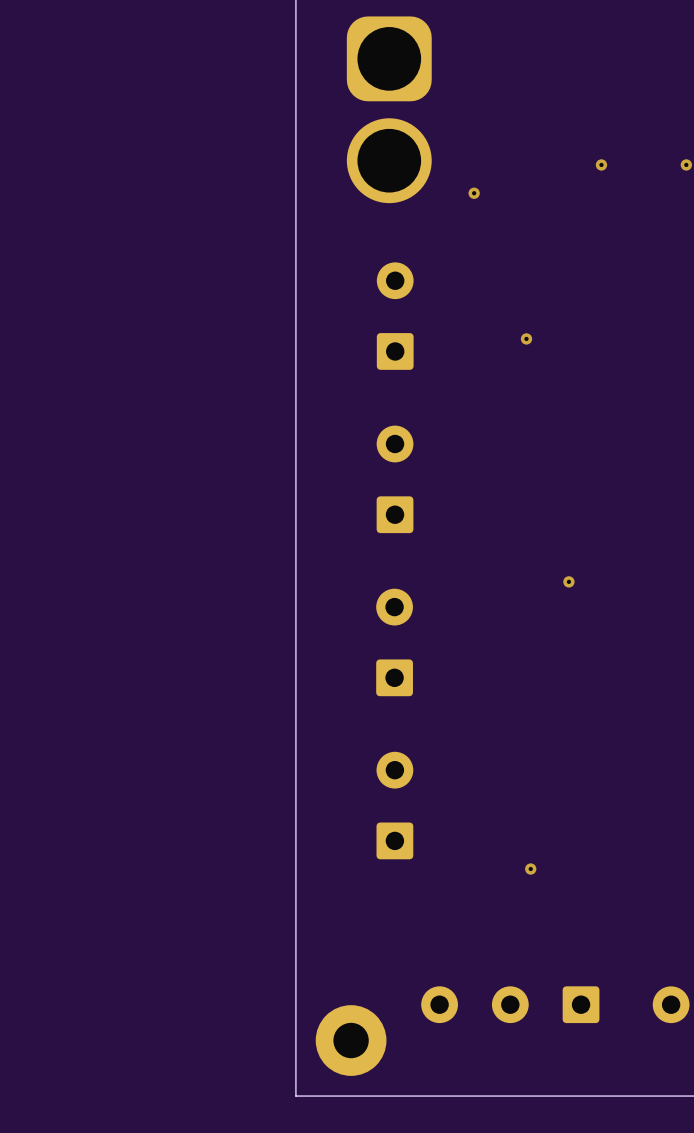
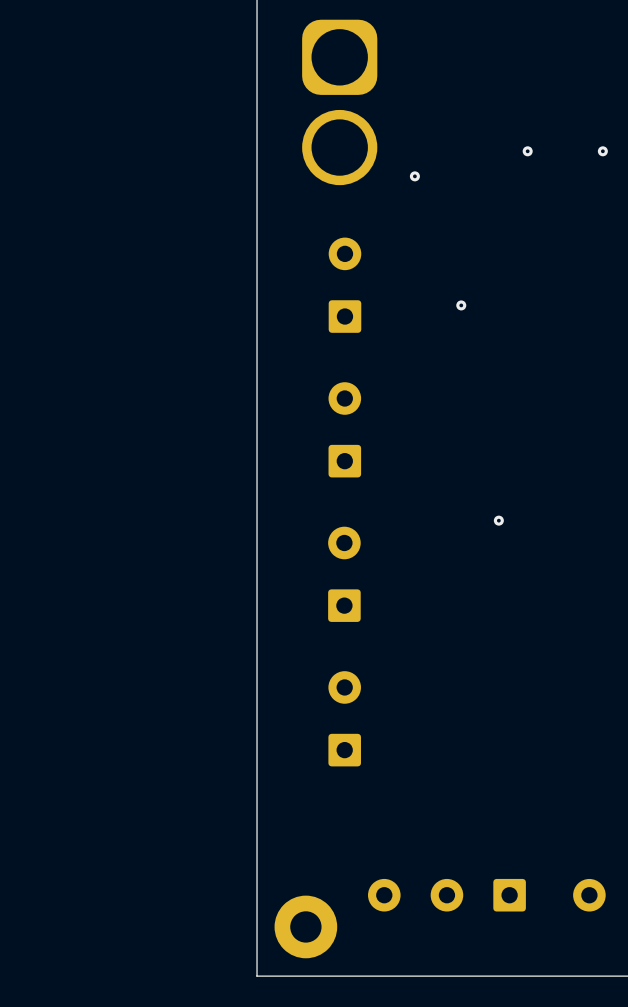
via: (530, 869) -> none

